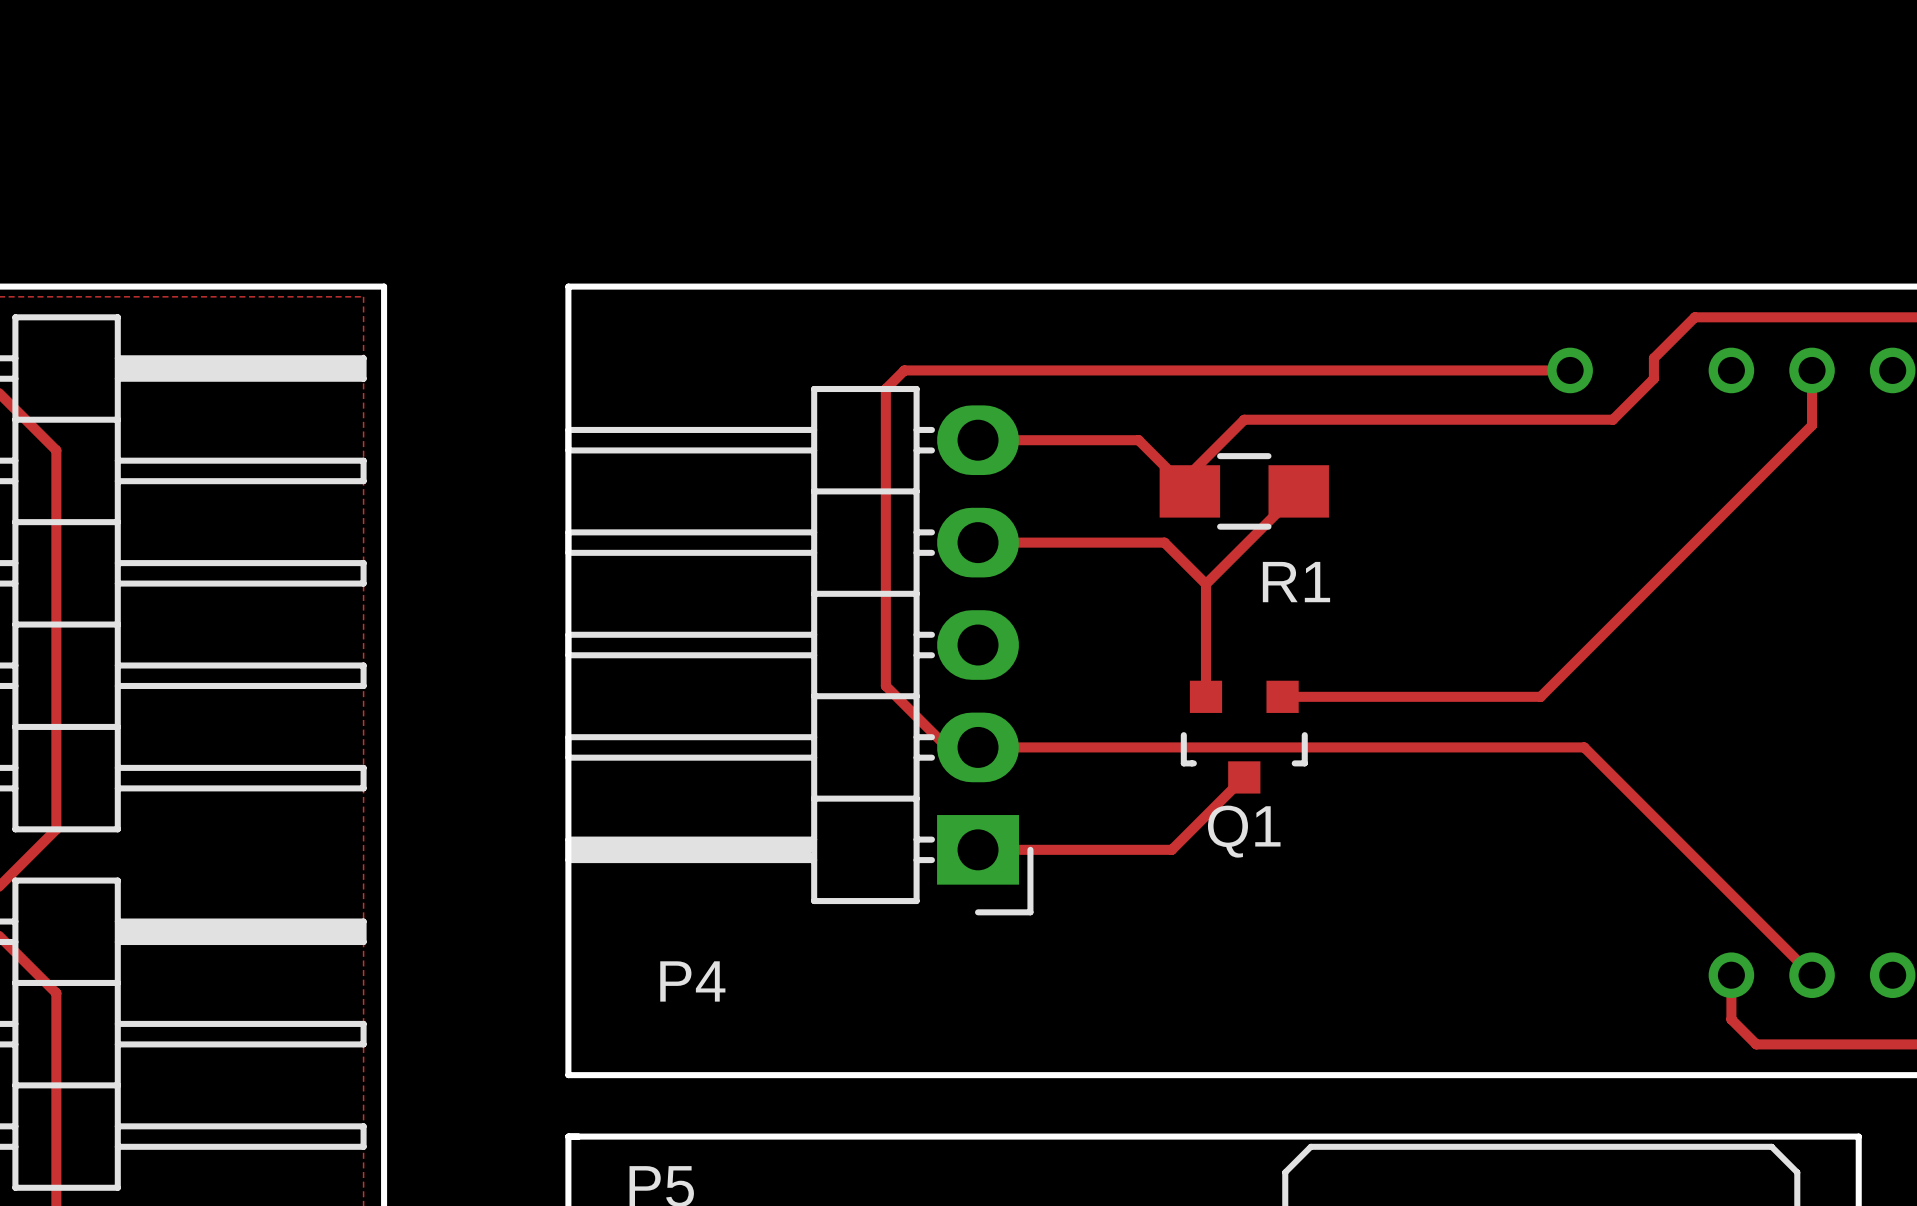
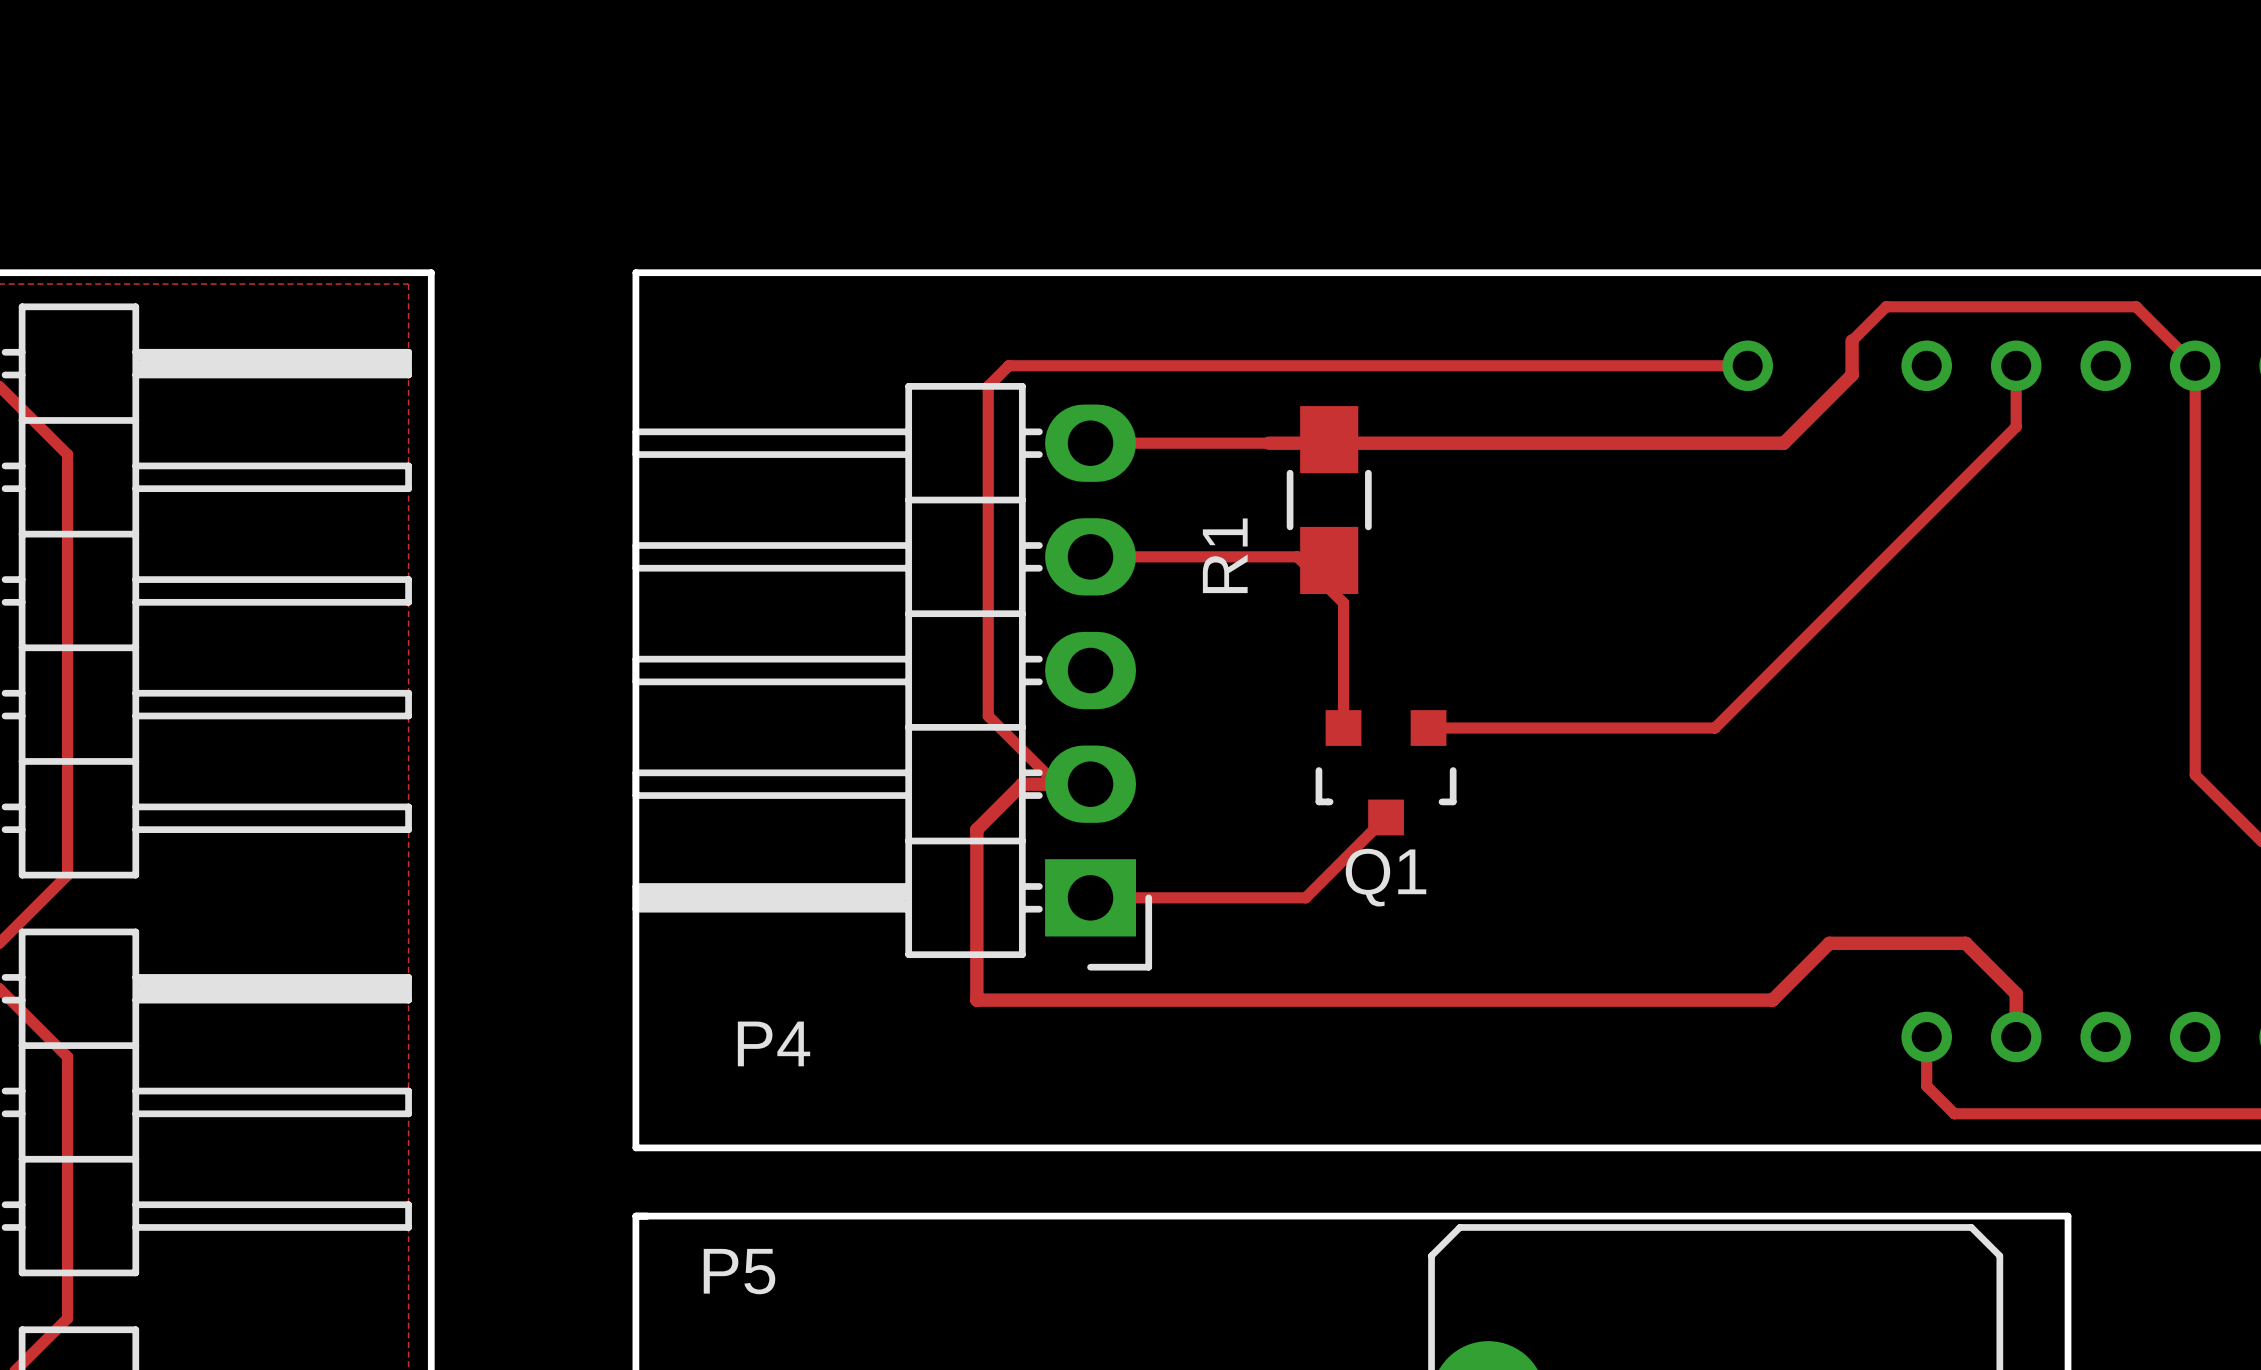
top track: (1664, 348) (1653, 358) (1653, 378) (1612, 419) (1244, 419) (1189, 474) (1189, 491) (1138, 440) -> (1852, 340) (1852, 375) (1783, 443) (1268, 443)
R1 rotation: 0° (1244, 491) -> 90° clockwise (1329, 500)
top track: (1298, 491) (1205, 584) -> none
top track: (978, 747) (1584, 747) (1812, 975) -> (1056, 784) (1022, 784) (976, 829) (976, 1000) (1772, 1000) (1829, 943) (1965, 943) (2016, 993) (2016, 1037)

